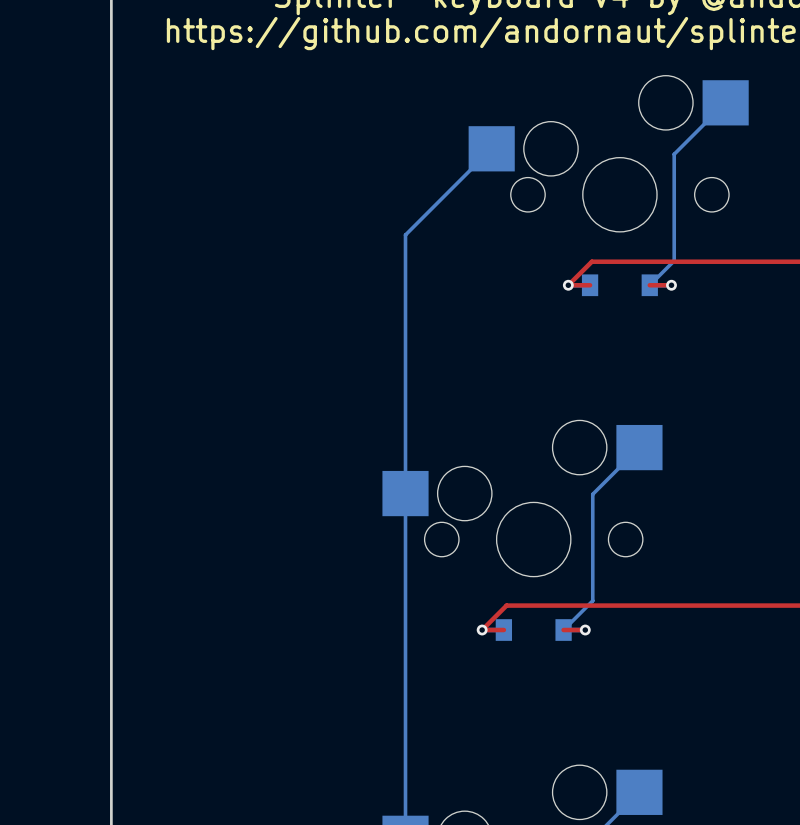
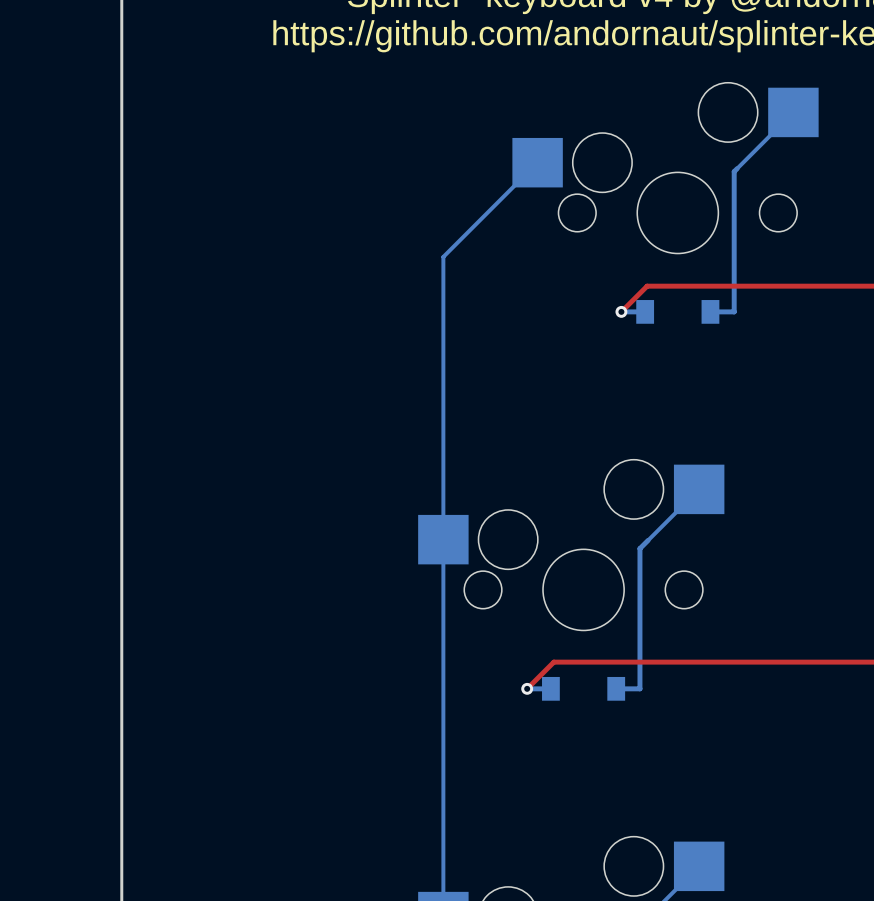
bottom track: (674, 154) (674, 260) (649, 285) -> (737, 168) (734, 171) (734, 311)
top track: (568, 285) (590, 285) -> none
top track: (649, 285) (671, 285) -> none
via: (671, 285) -> none
bottom track: (592, 494) (592, 600) (563, 630) -> (648, 540) (639, 548) (639, 688)
top track: (482, 630) (503, 630) -> none
top track: (563, 630) (585, 630) -> none
via: (585, 630) -> none

